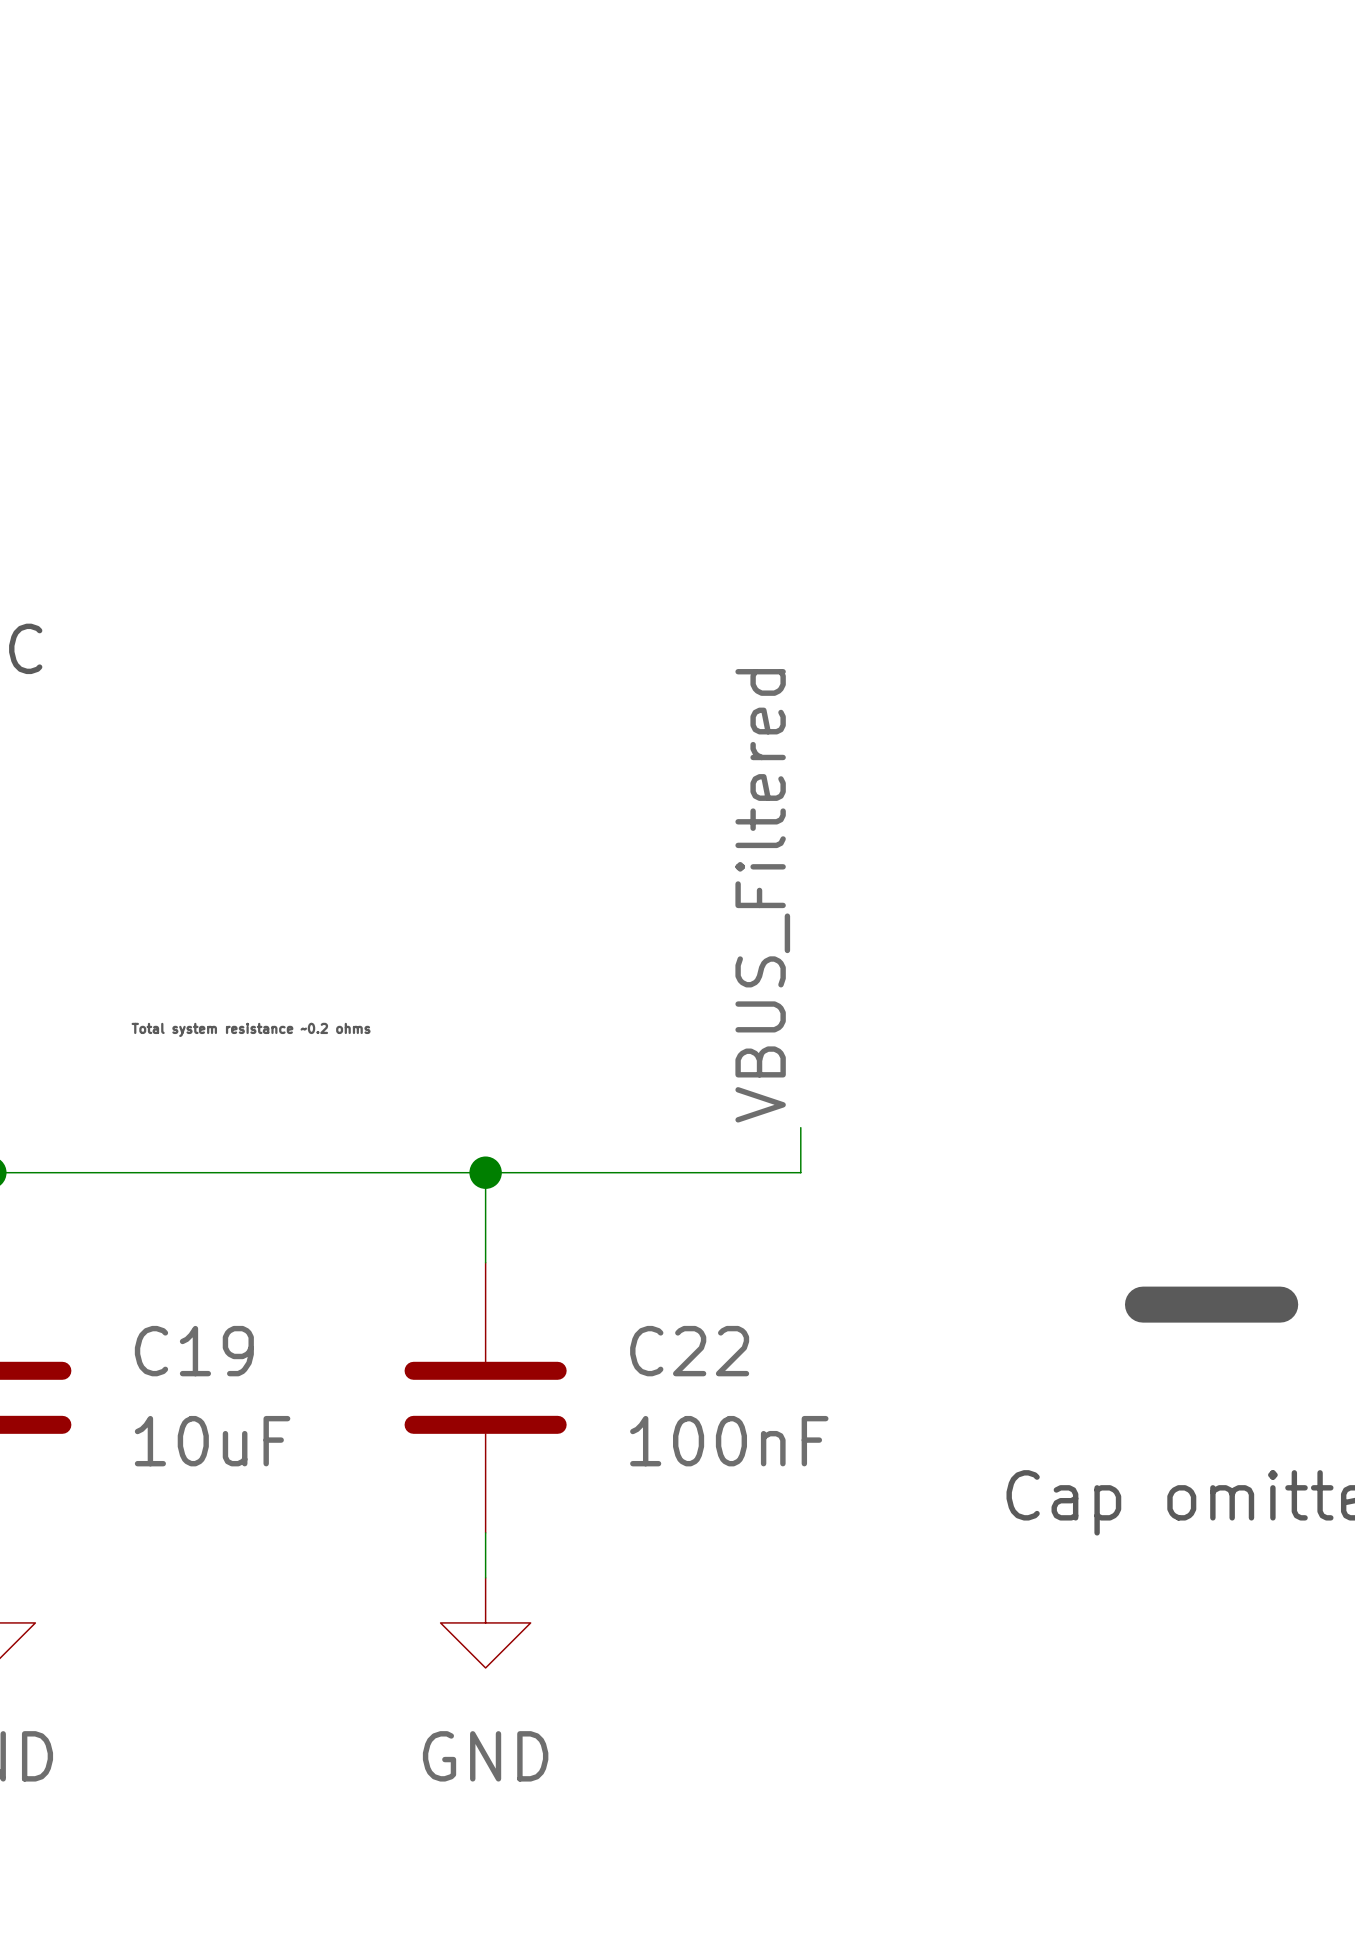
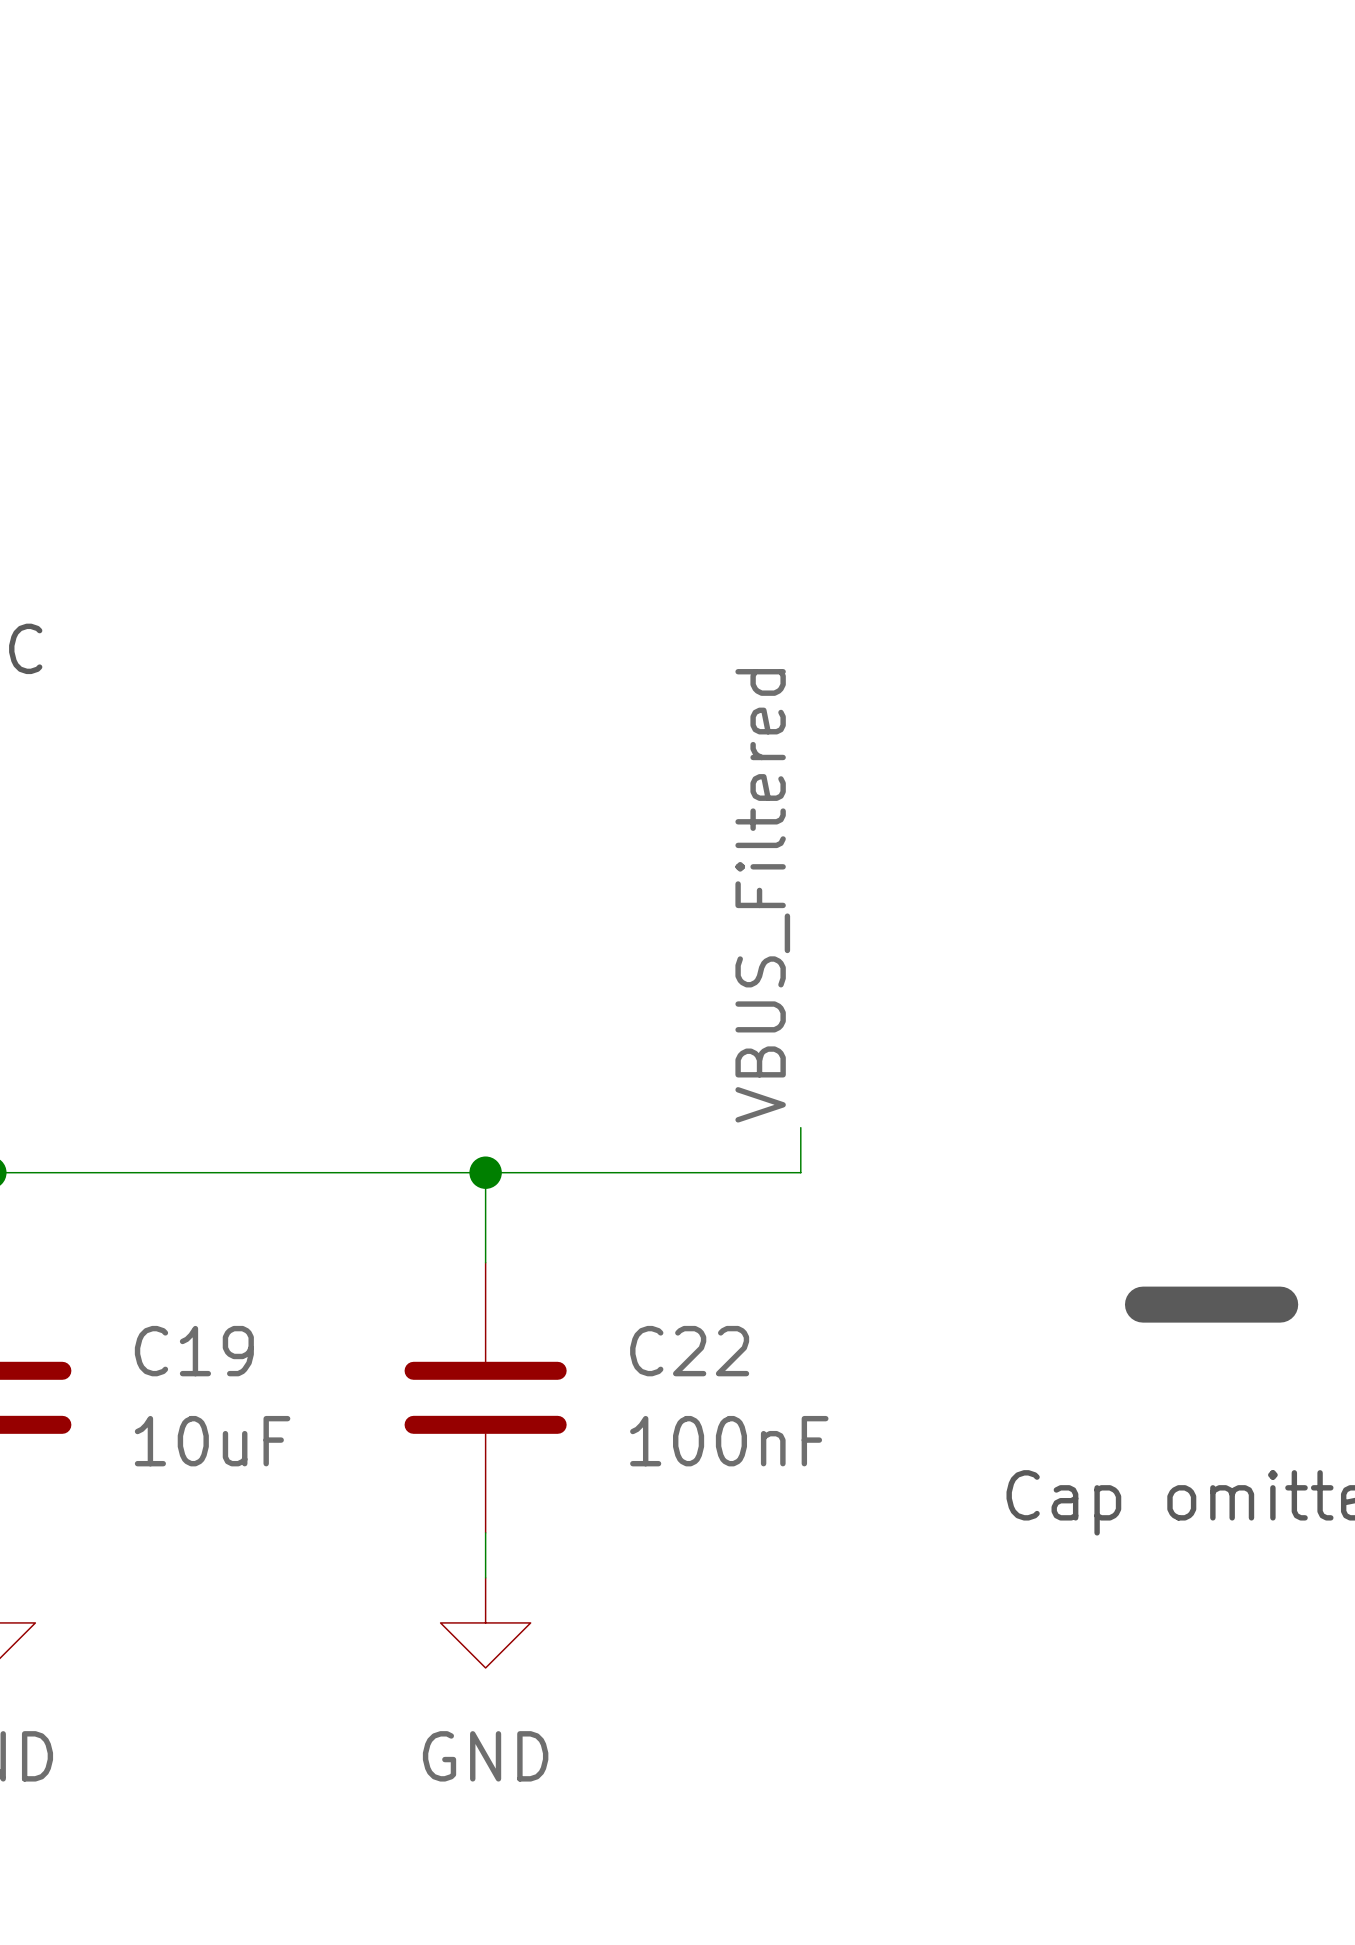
text: Total system resistance ~0.2 ohms (251, 1029) -> none

